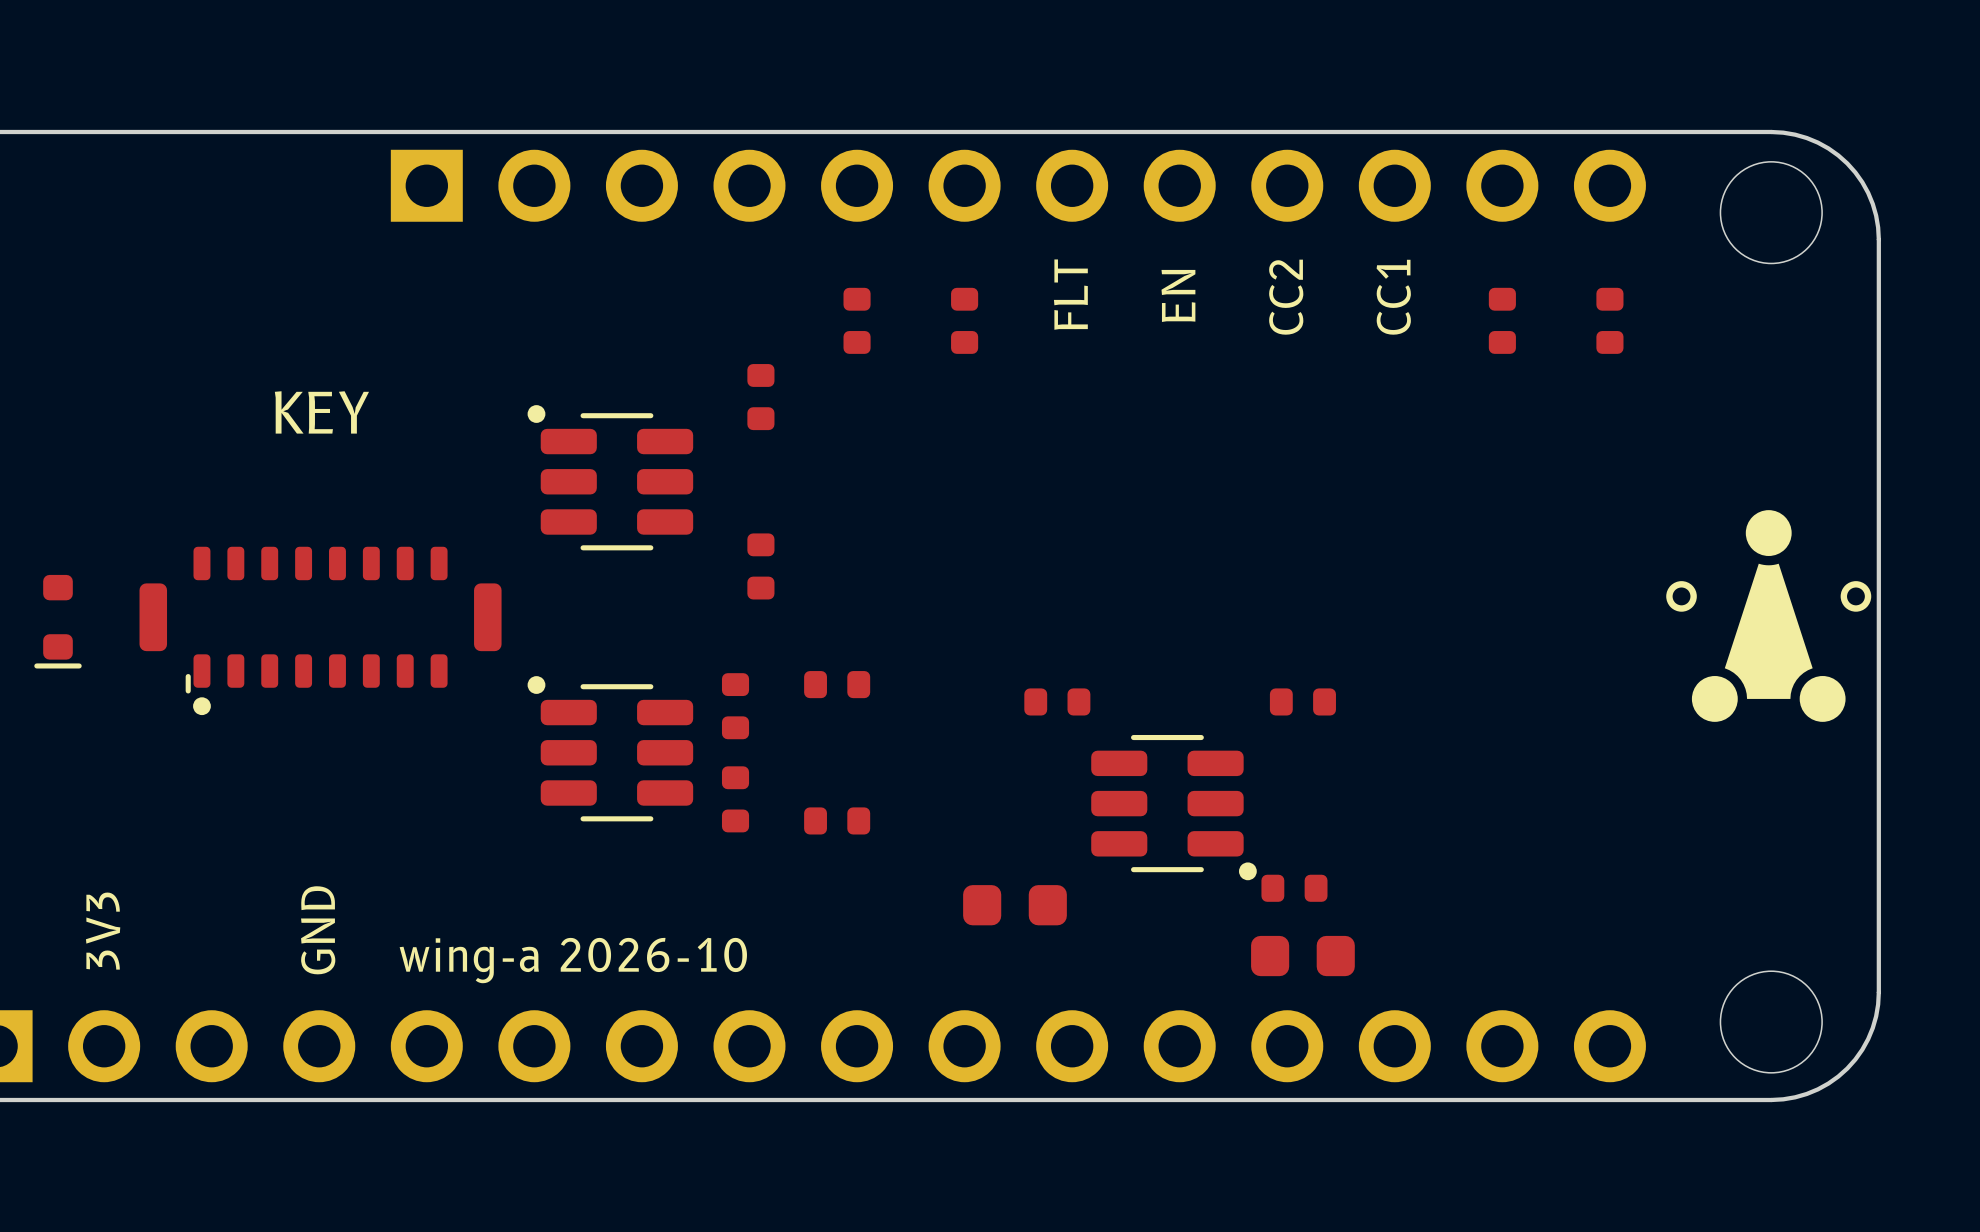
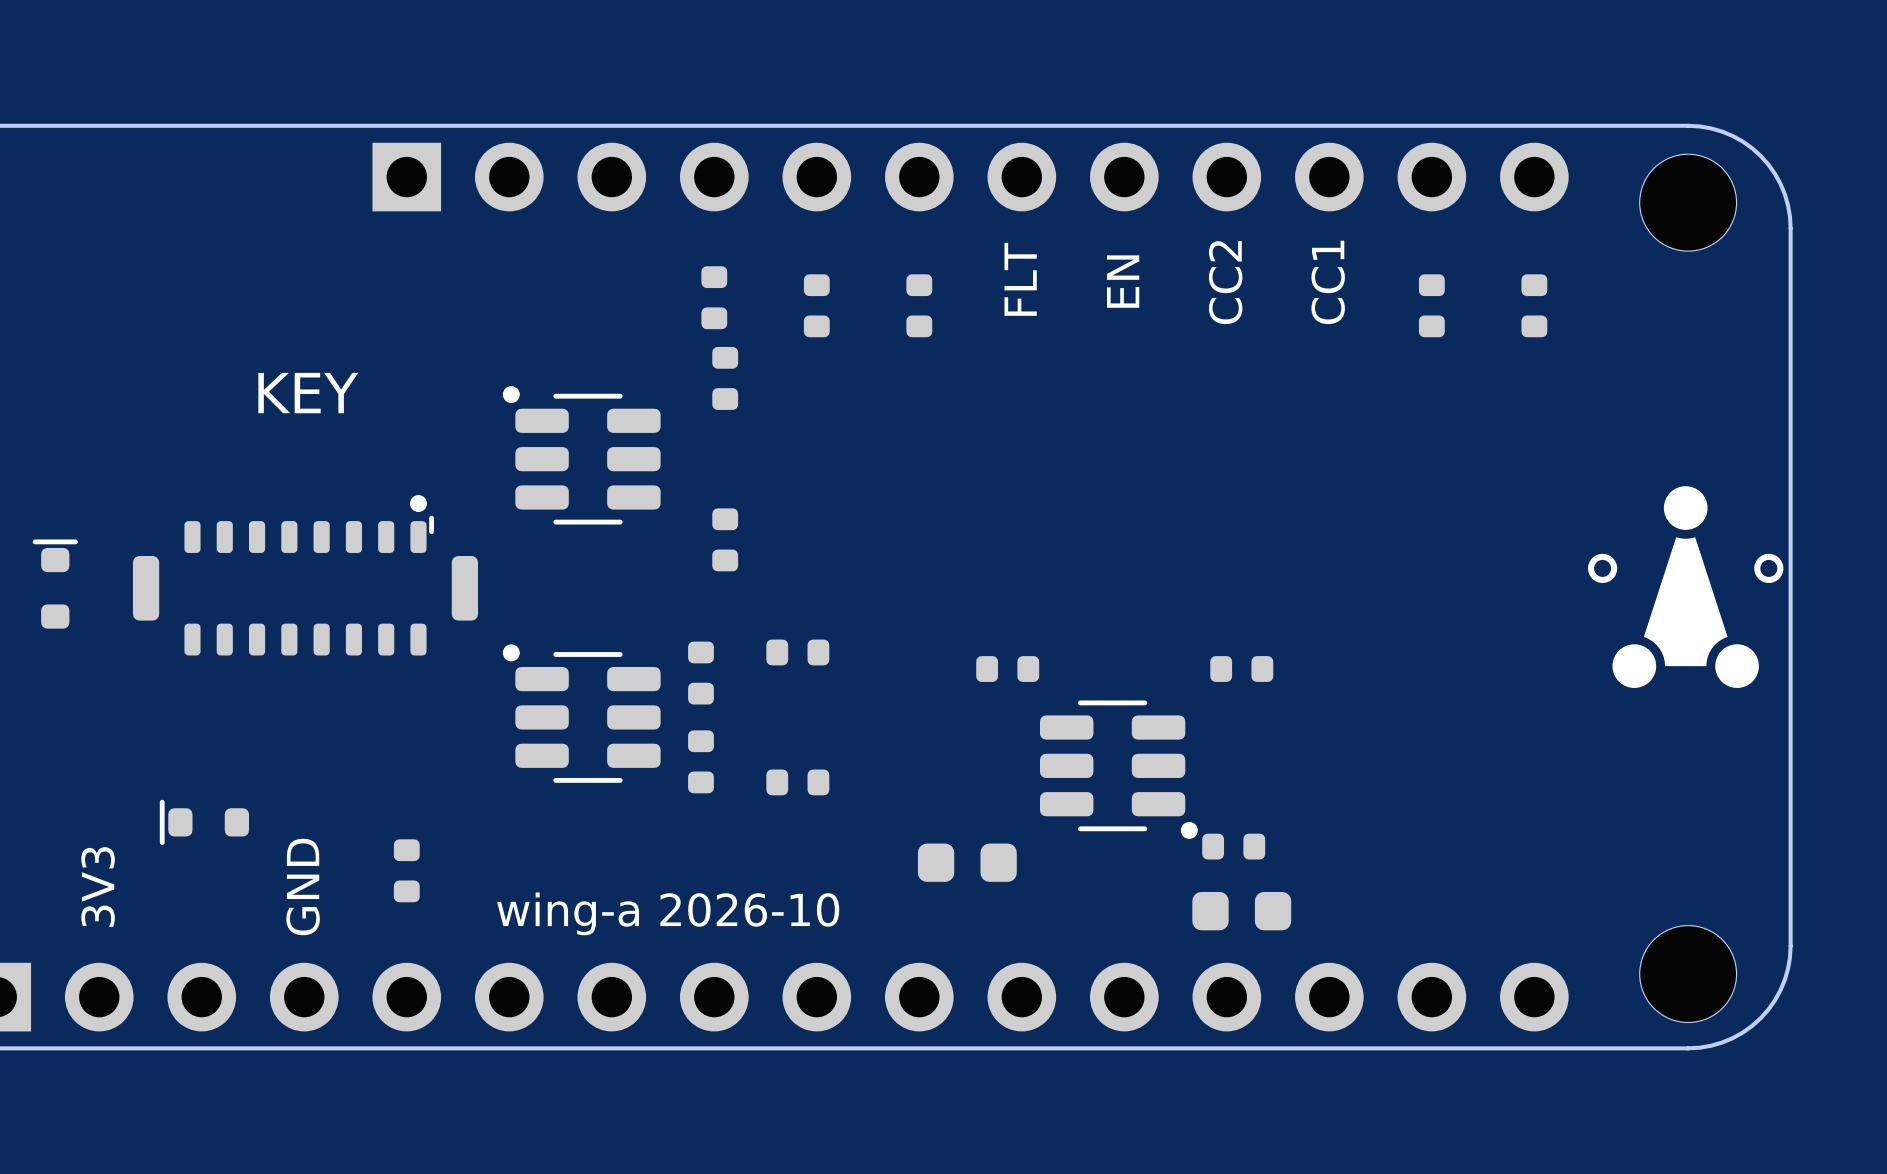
part: none -> (714, 297)
part rotation: 0° (57, 621) -> 180° (55, 584)
part rotation: 0° (320, 630) -> 180° (305, 575)
part: none -> (204, 822)
part: none -> (406, 870)
text position: wing-a 2026-10 (573, 960) -> wing-a 2026-10 (668, 913)

